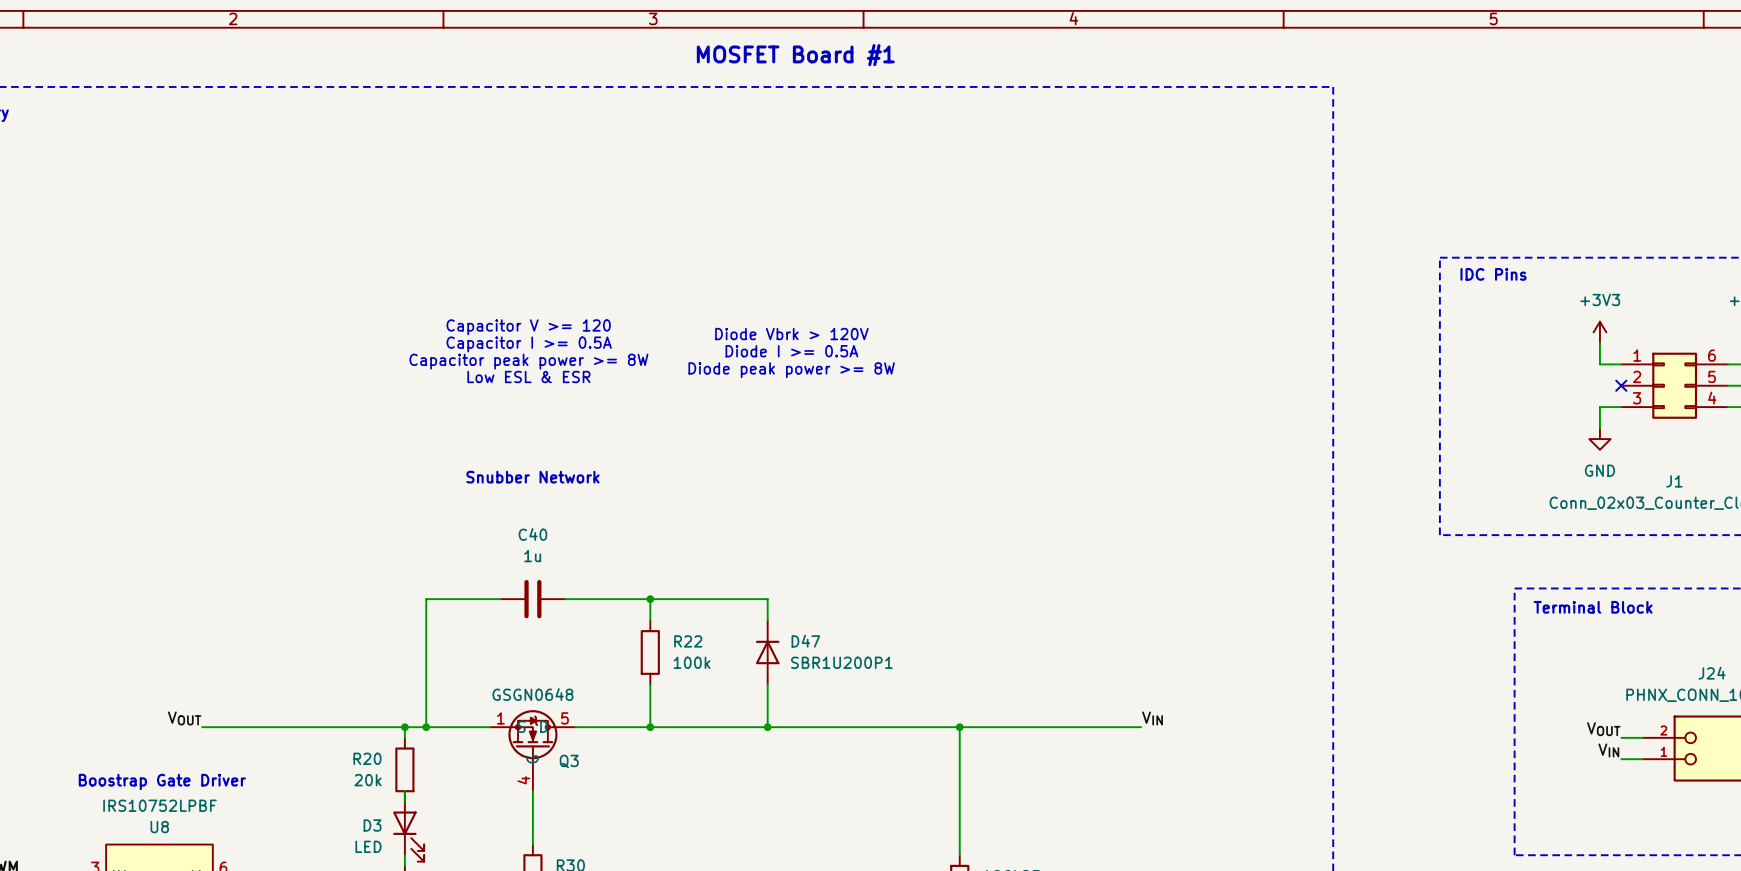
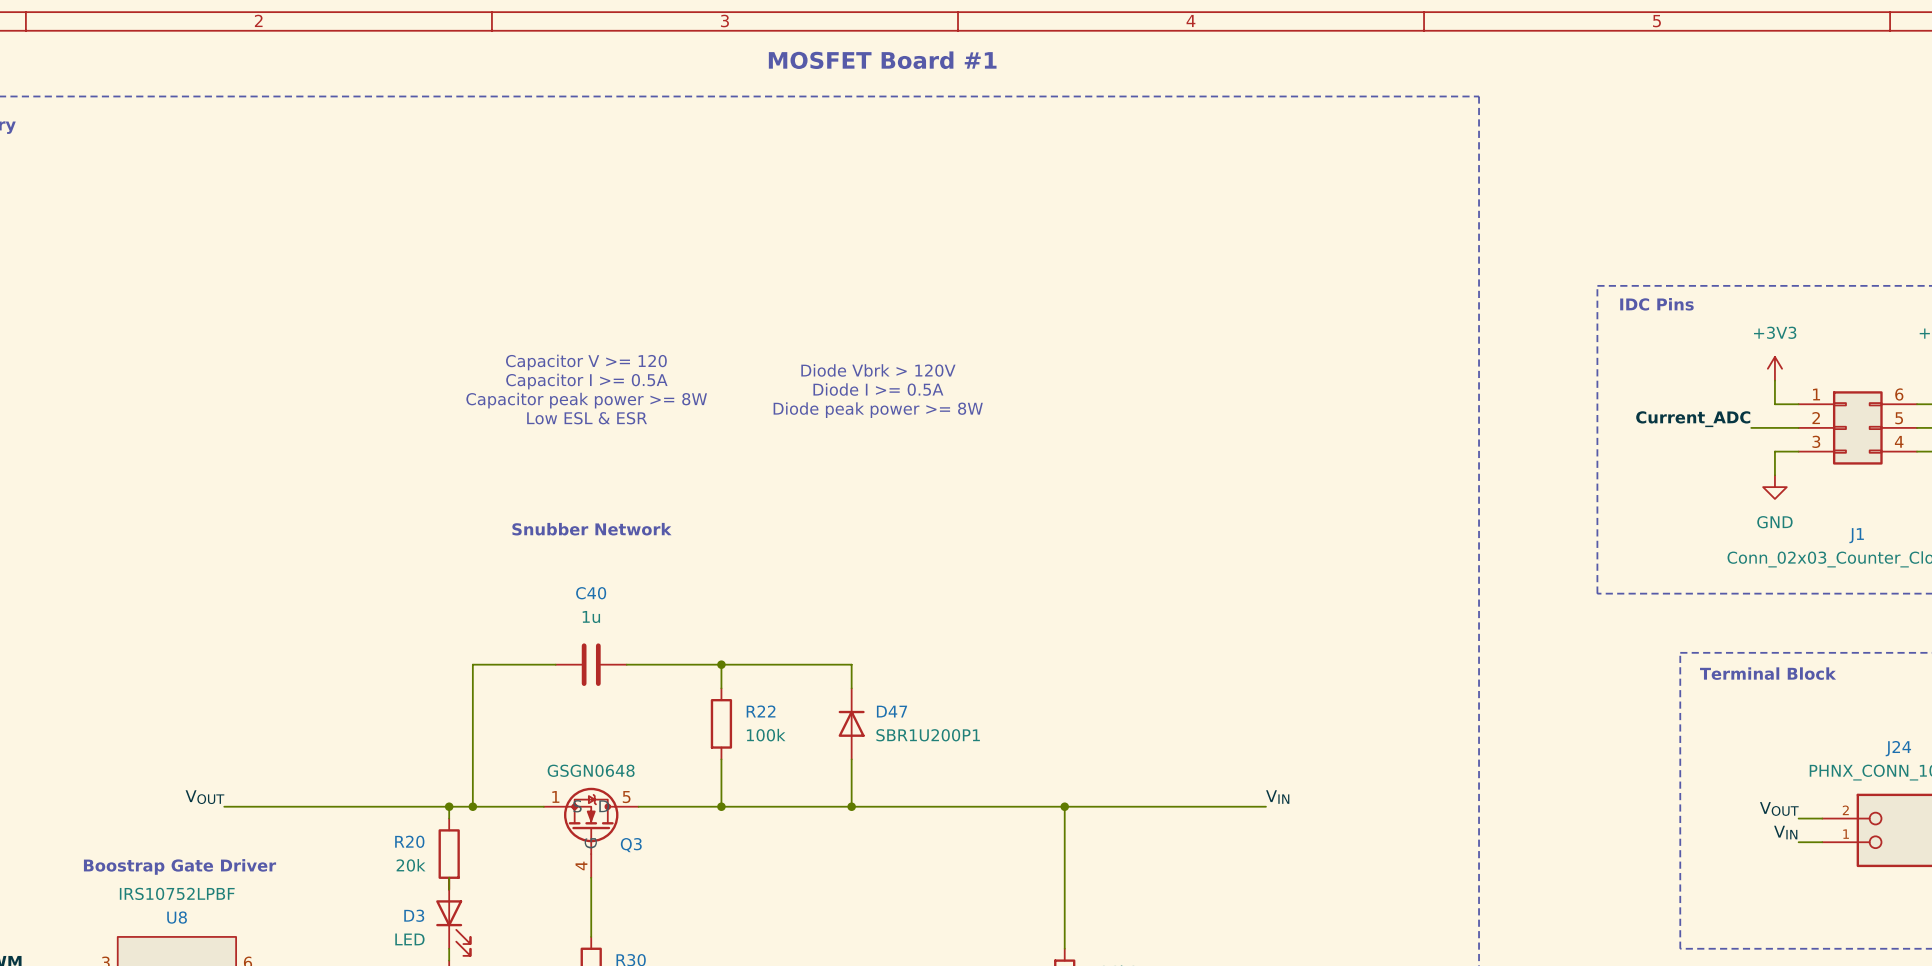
label: none -> Current_ADC (1693, 419)
wire: none -> (1751, 427) (1798, 427)
no-connect mark: (1621, 385) -> none

